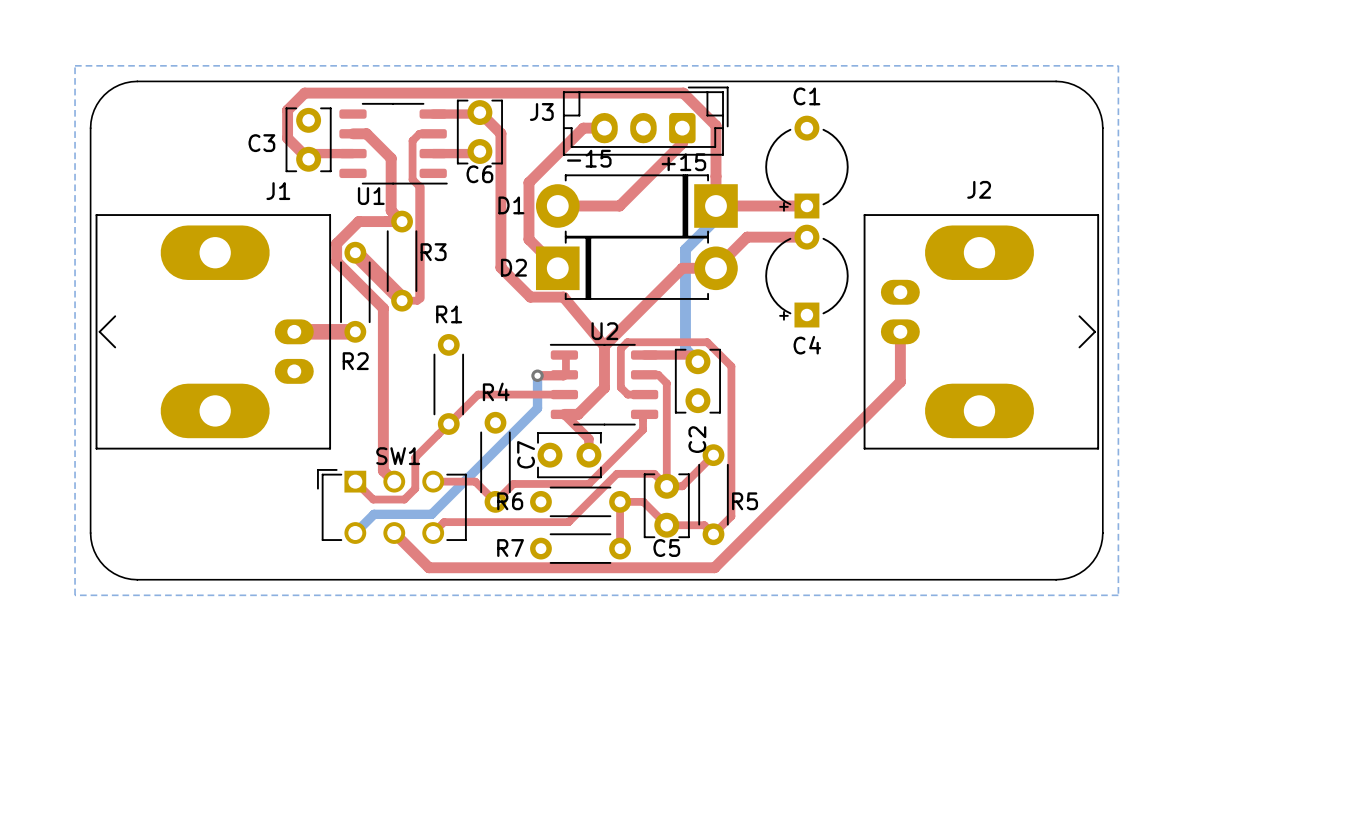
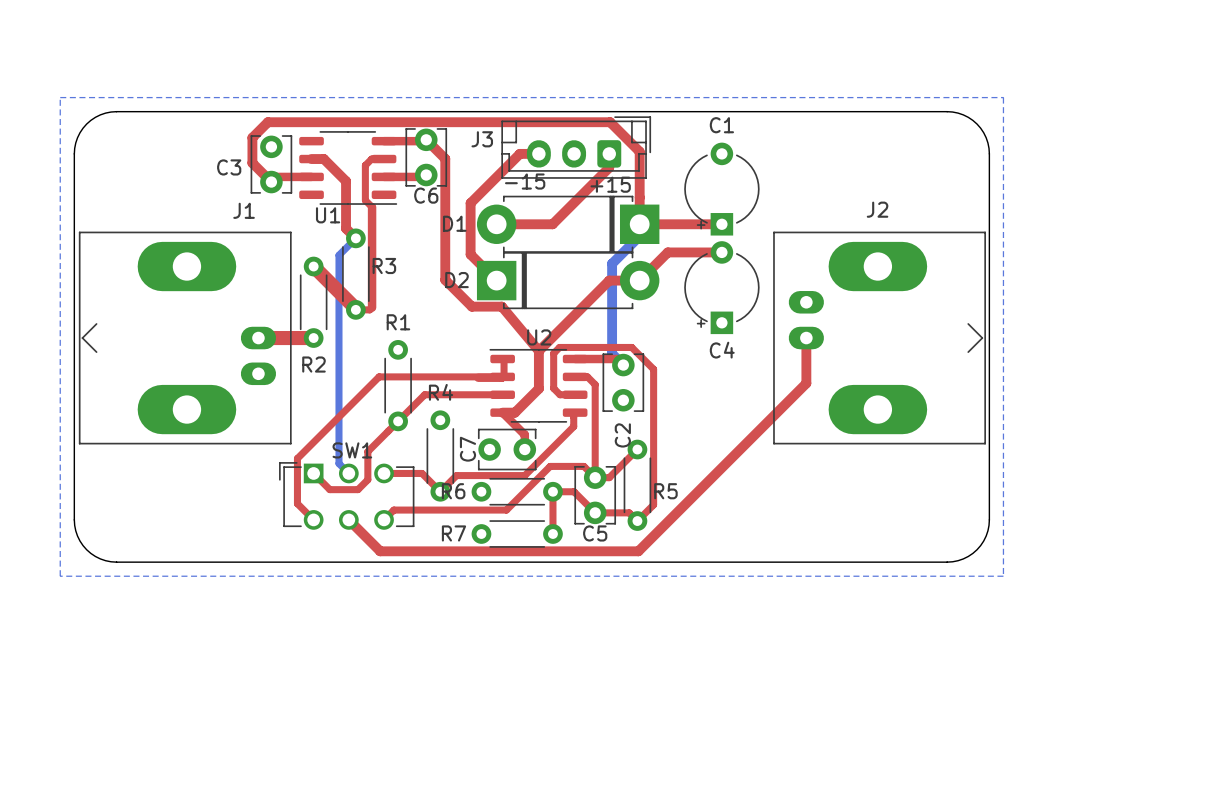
top track: (402, 221) (358, 221) (336, 243) (336, 261) (383, 308) (383, 470) (394, 481) -> none
bottom track: none -> (355, 238) (338, 255) (338, 463) (348, 473)
top track: none -> (504, 376) (379, 376) (297, 458) (297, 503) (313, 519)
bottom track: (537, 375) (537, 408) (431, 514) (374, 514) (355, 533) -> none
via: (537, 375) -> none

